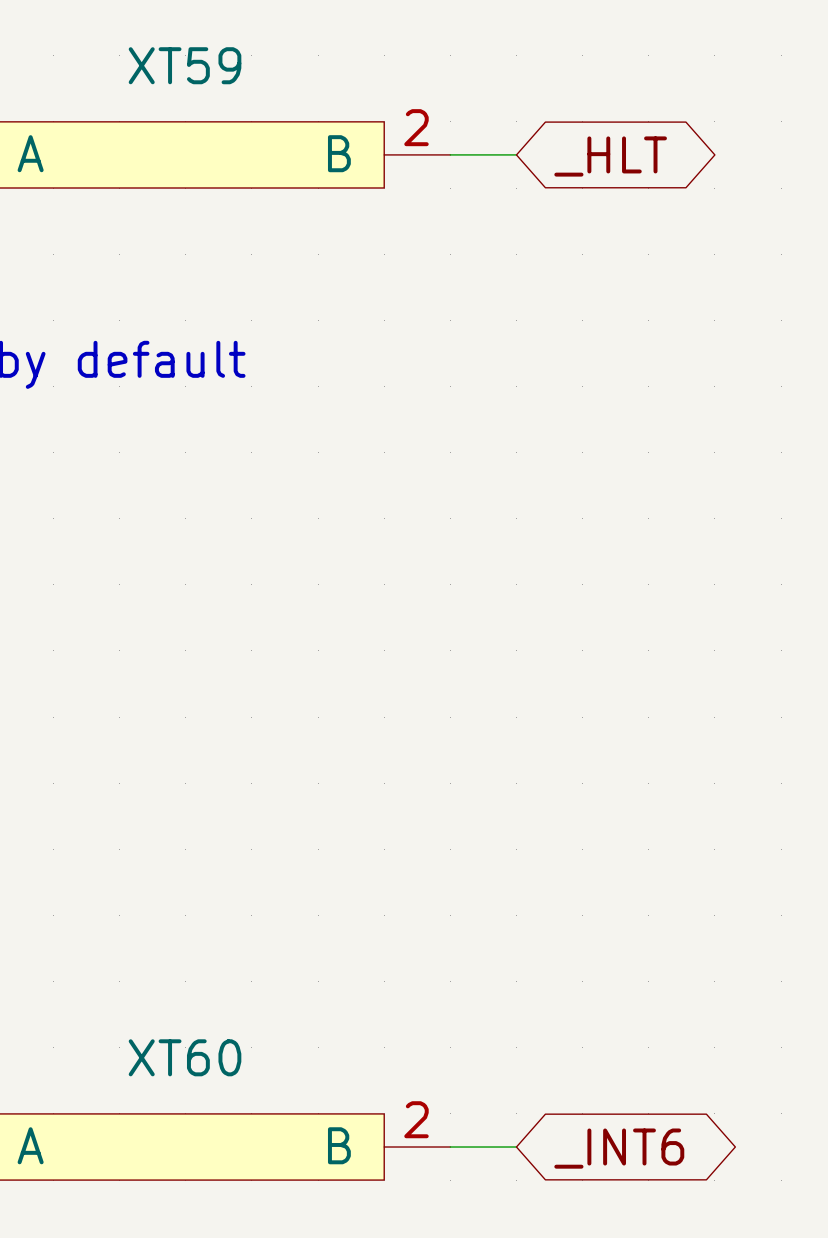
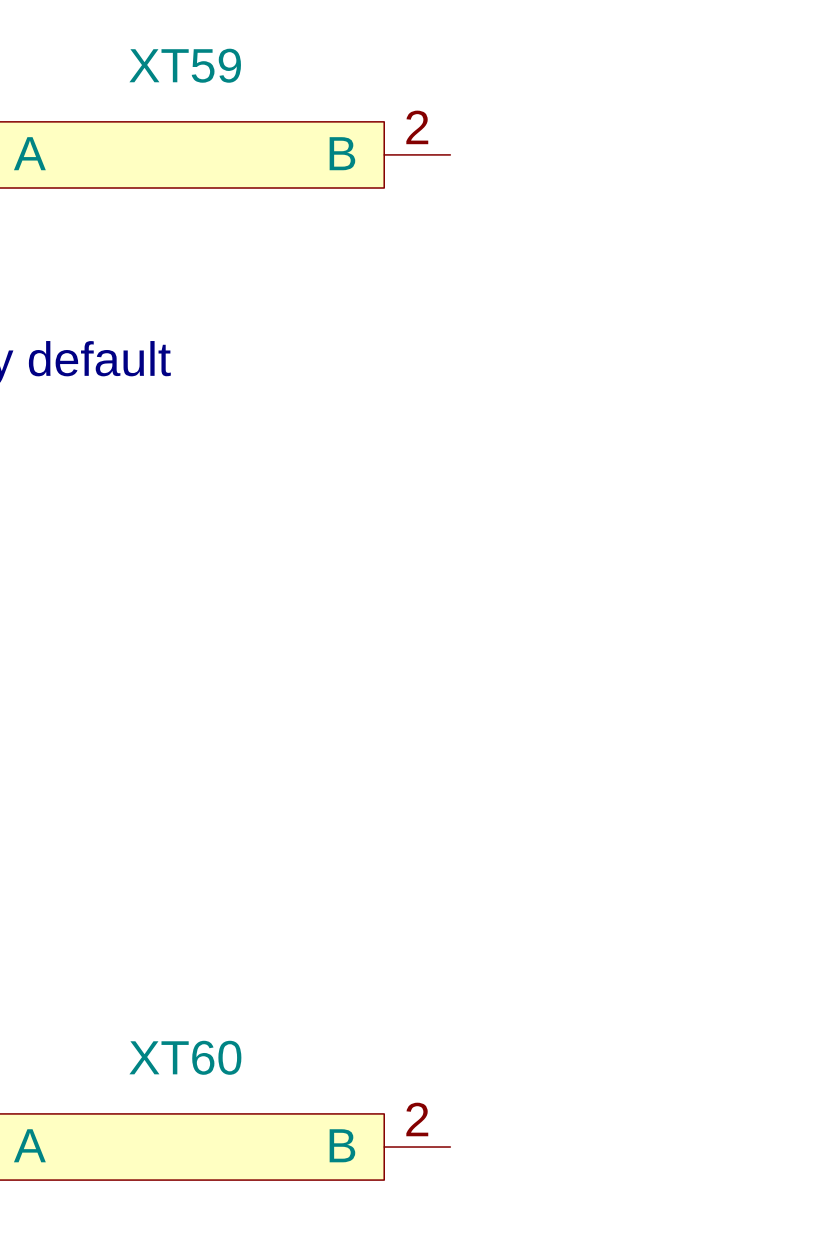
wire: (450, 154) (516, 154) -> none
global label: _HLT (610, 156) -> none
wire: (450, 1147) (516, 1147) -> none
global label: _INT6 (619, 1148) -> none

